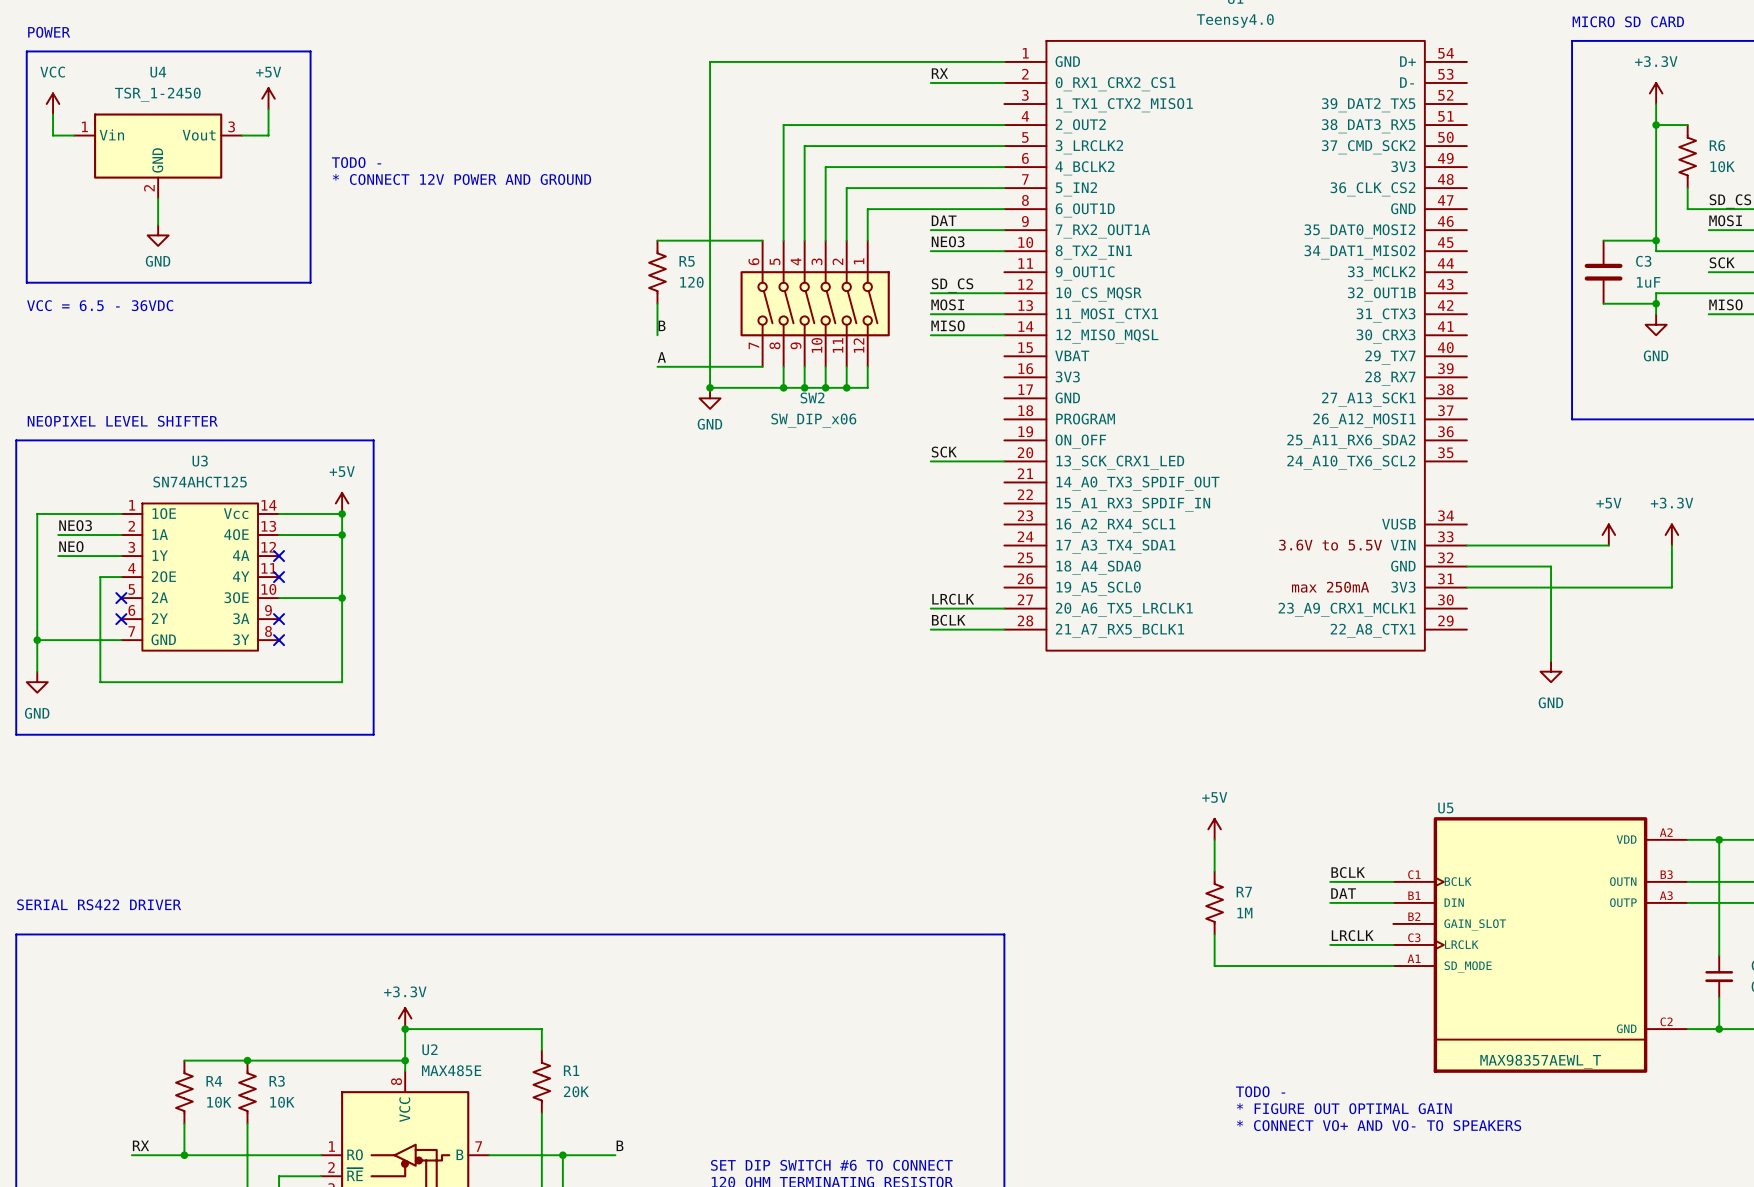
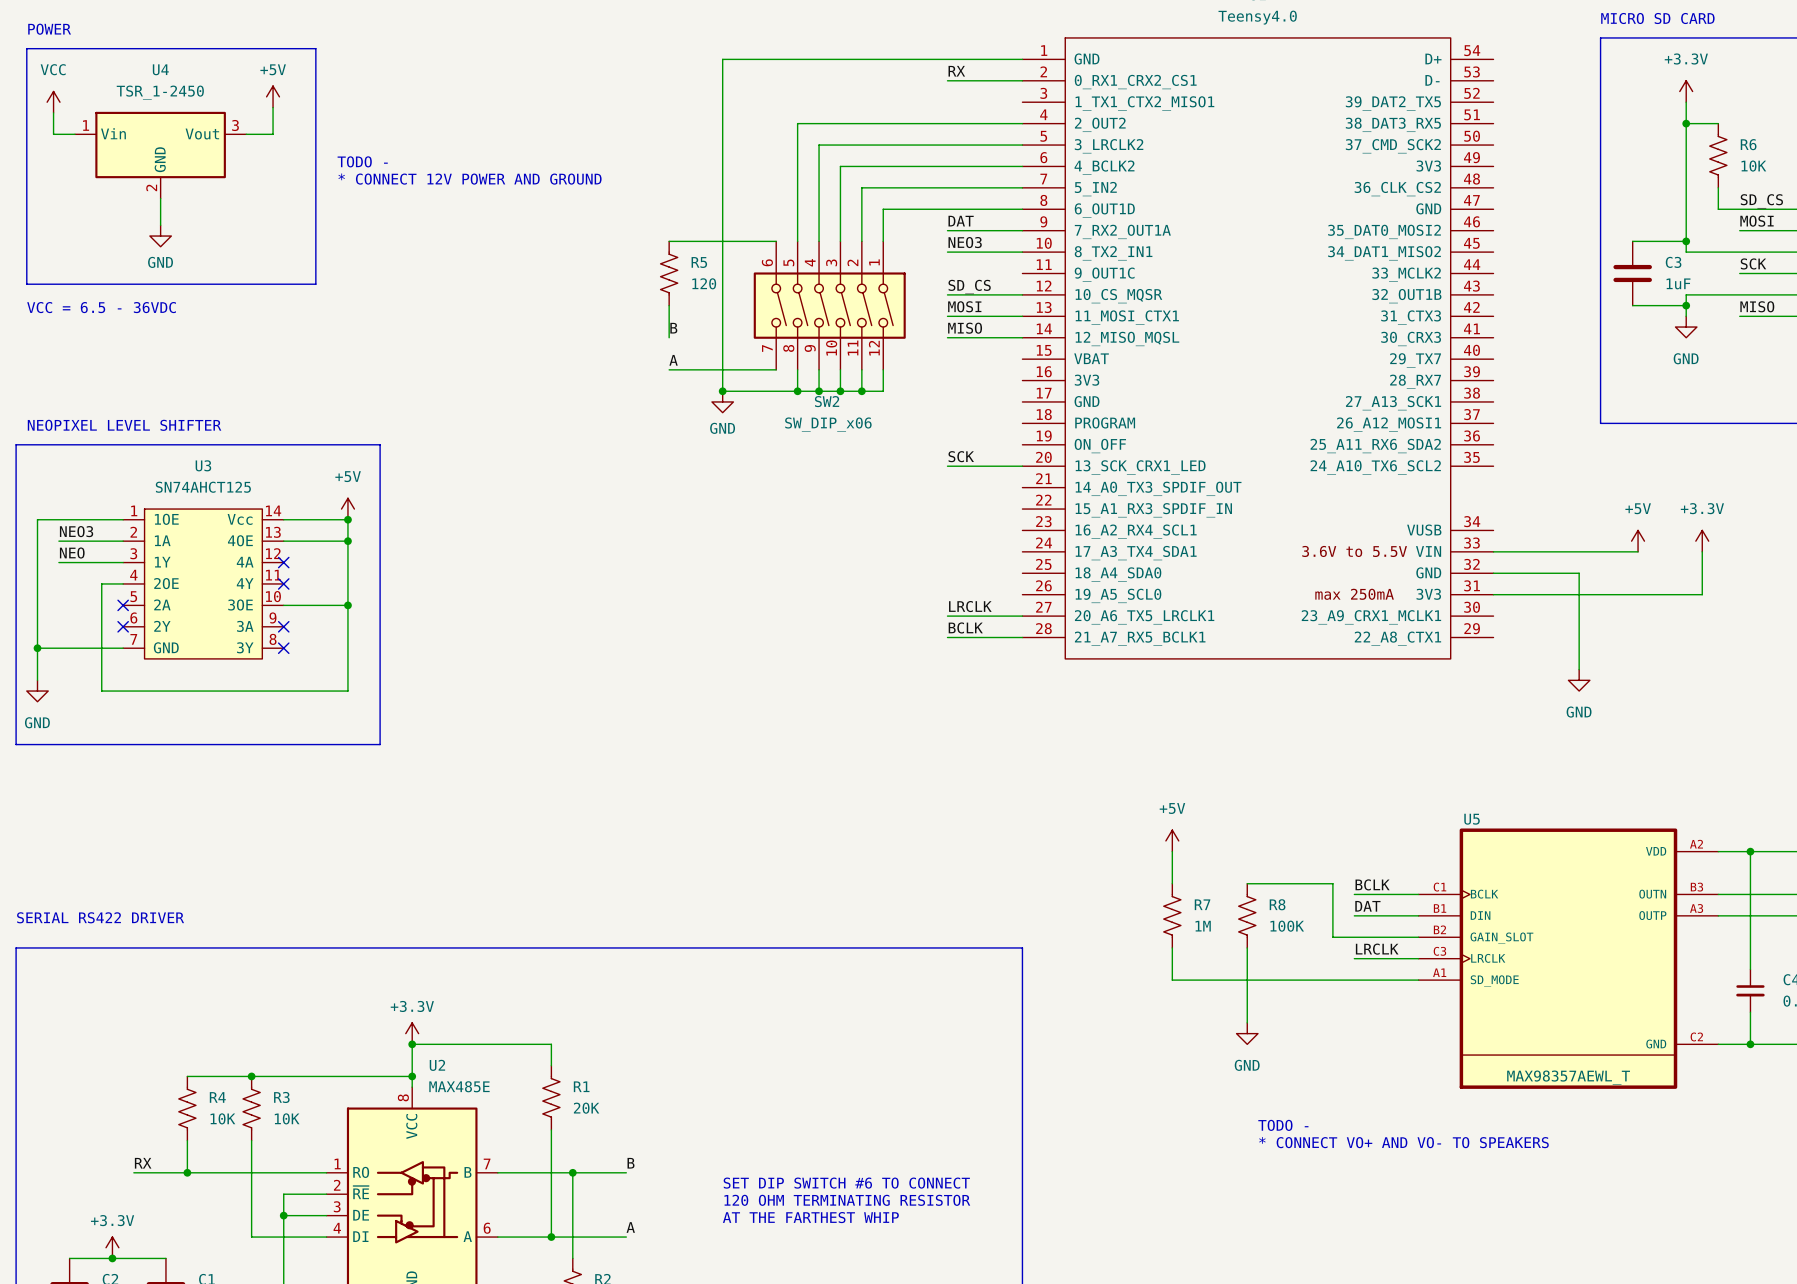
power symbol position: +5V (1214, 829) -> +5V (1172, 840)
wire: (1214, 839) (1214, 871) -> (1172, 851) (1172, 883)
wire: none -> (1247, 883) (1332, 883) (1332, 937) (1418, 937)
R7 position: (1214, 902) -> (1172, 915)
R8: none -> 100K (1247, 915)
wire: (1214, 934) (1214, 966) -> (1172, 947) (1172, 980) (1236, 980)
wire: none -> (1247, 947) (1247, 1022)
power symbol: none -> GND (1247, 1033)
text: TODO - (1260, 1091) -> none
text: * FIGURE OUT OPTIMAL GAIN (1344, 1108) -> TODO - (1283, 1125)

